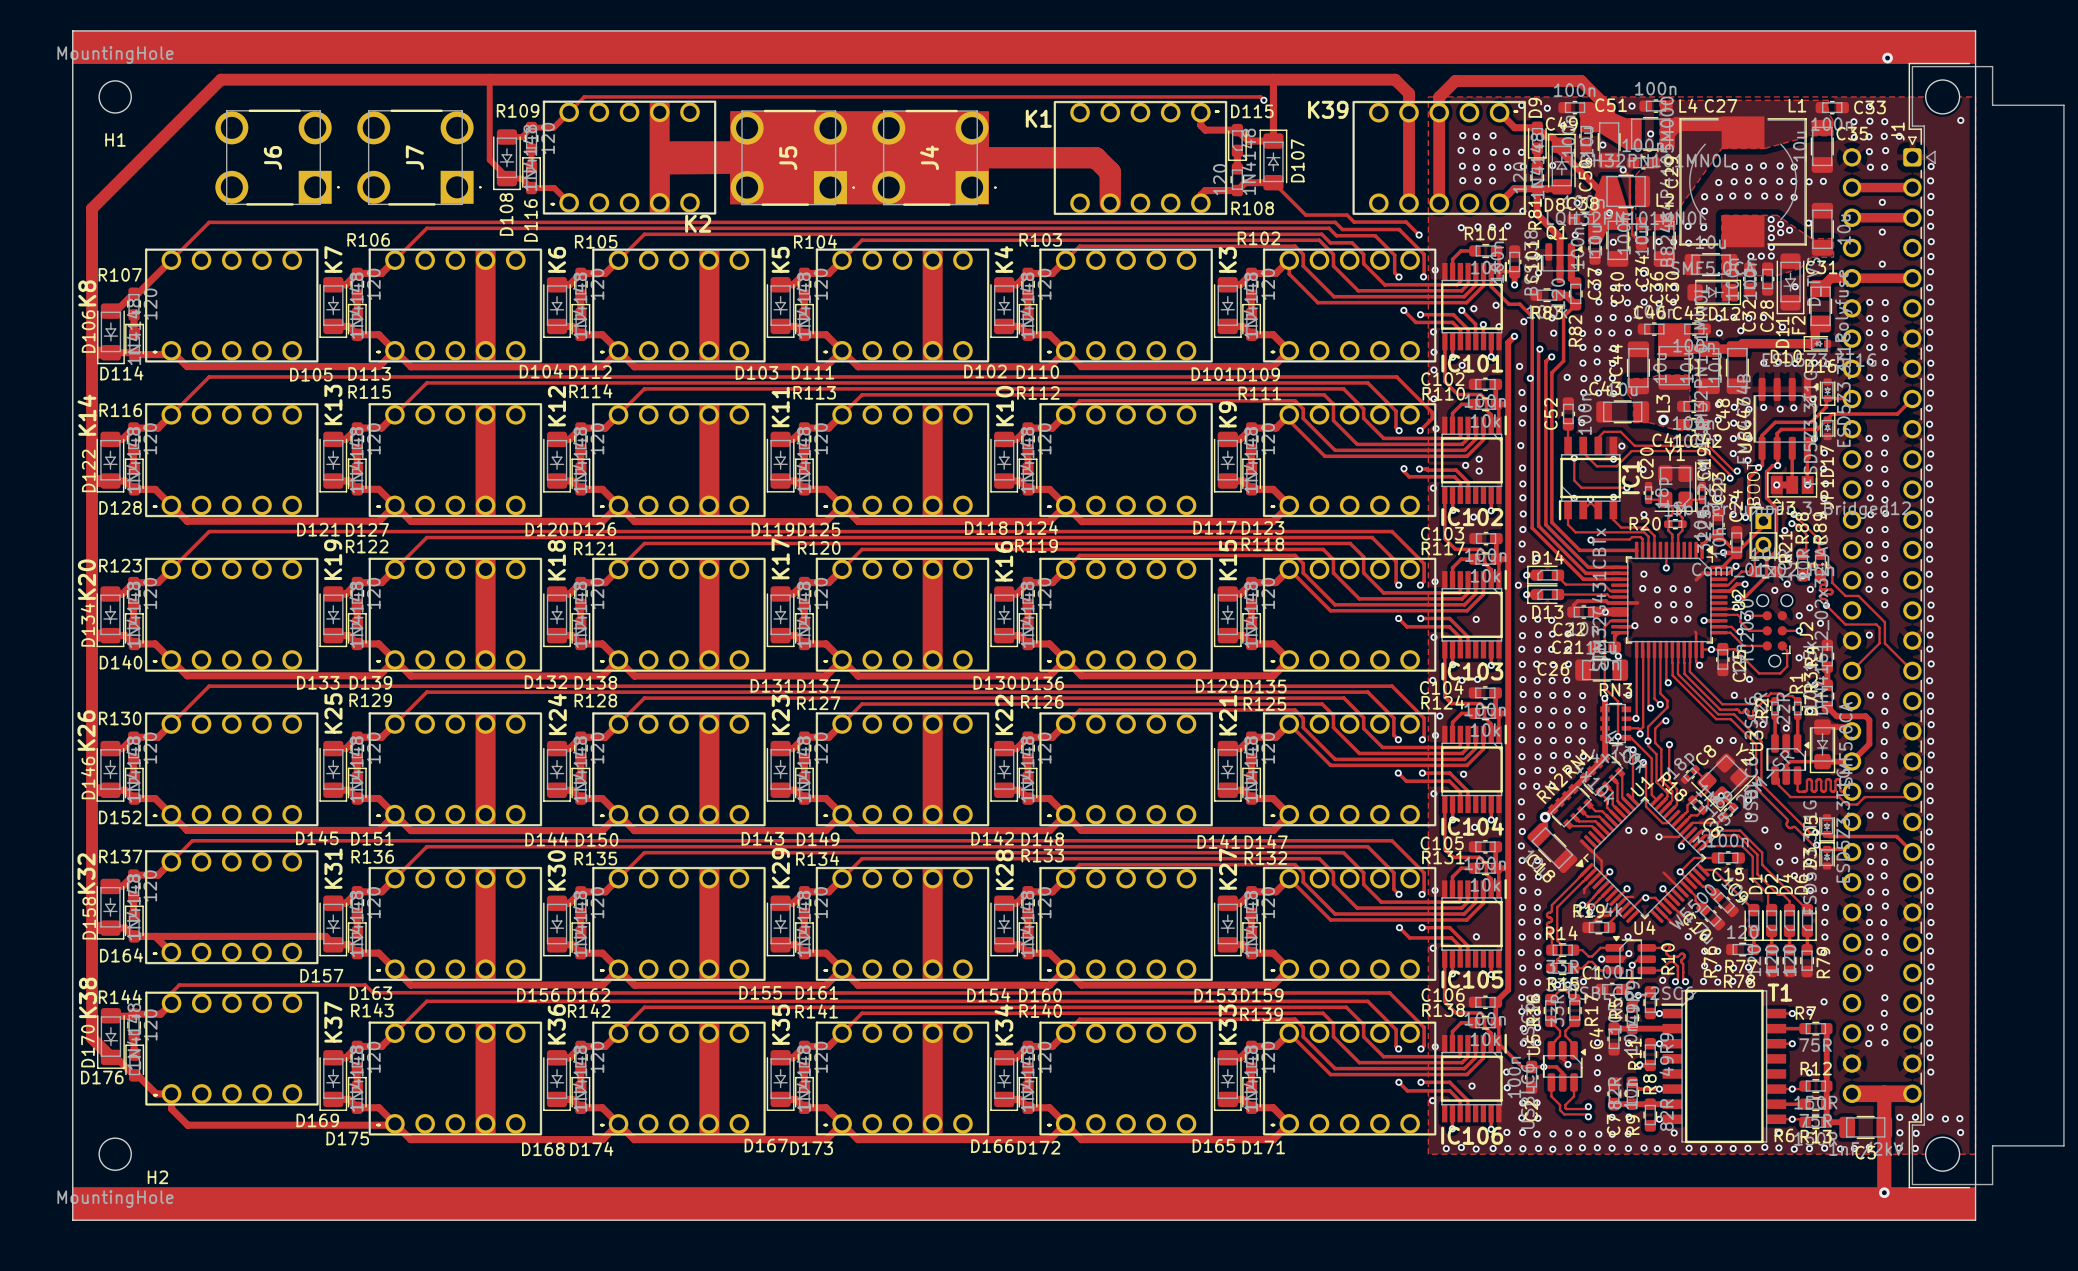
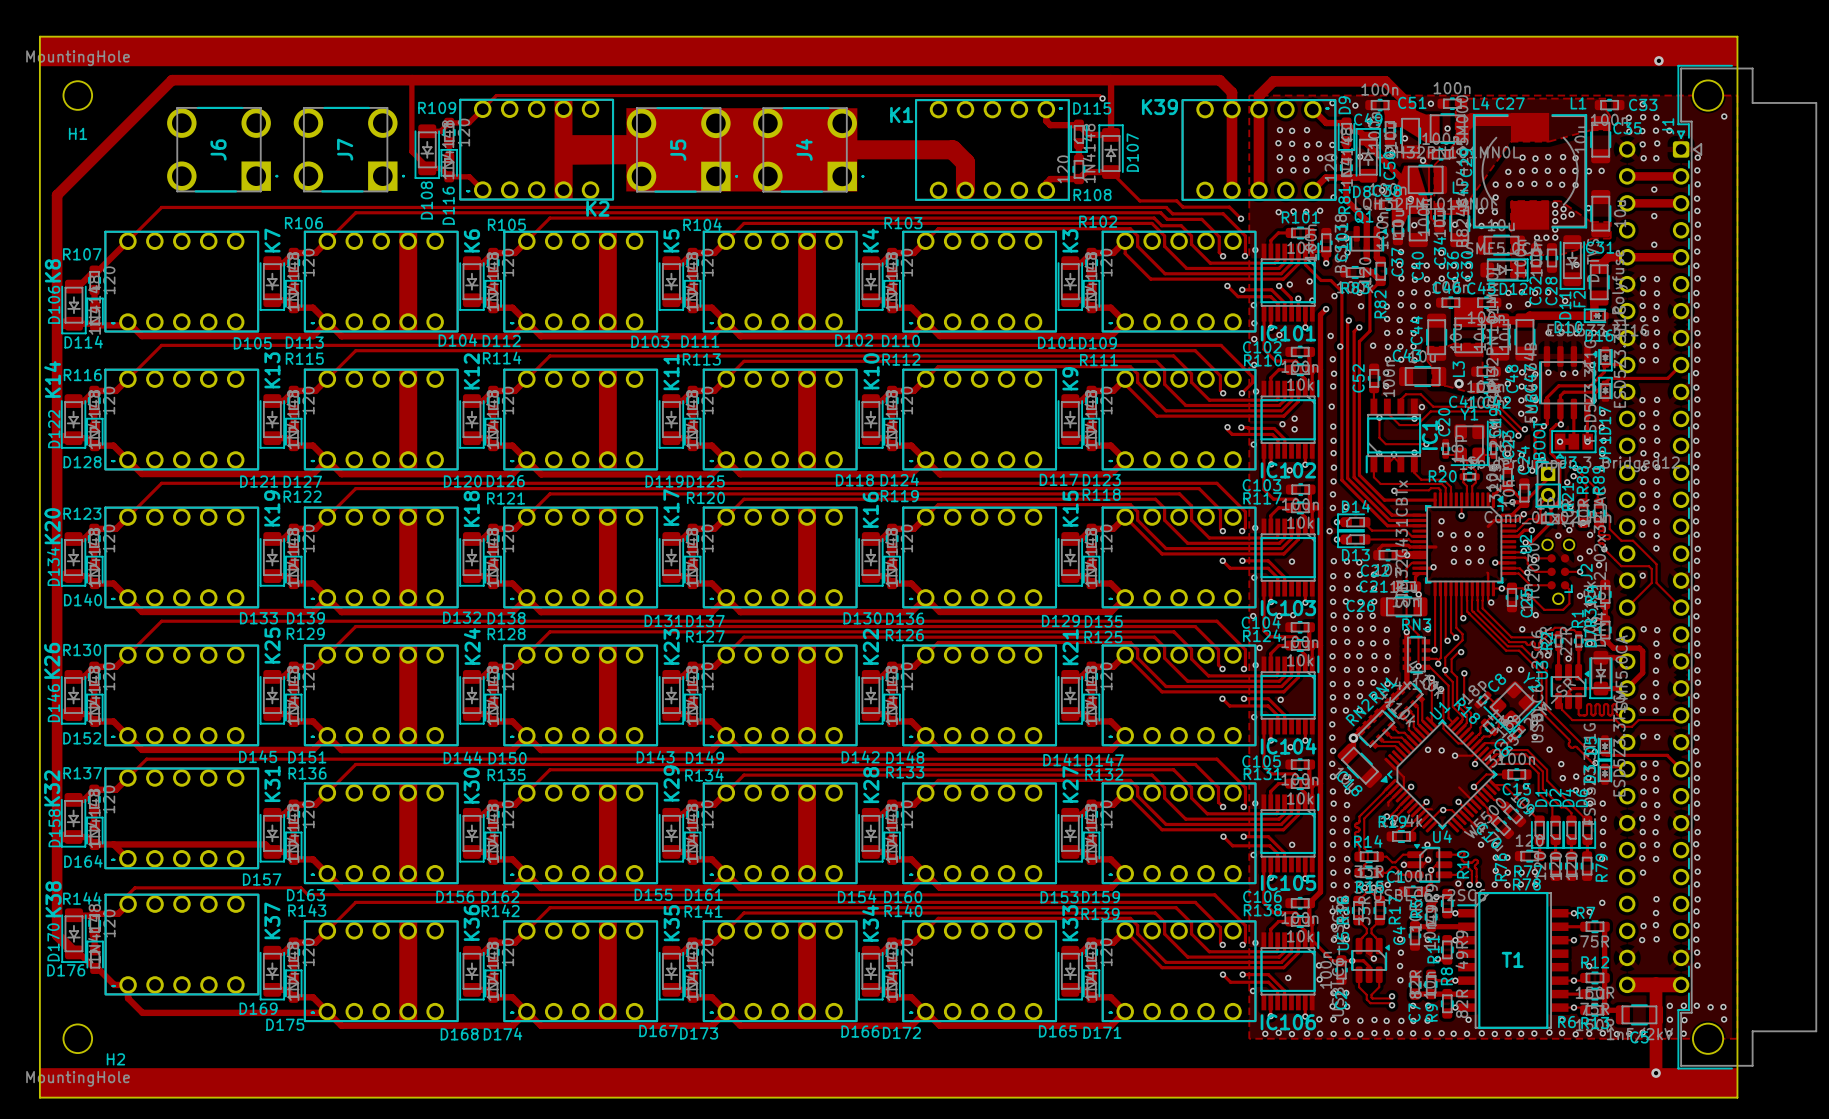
T1 name position: T1 (1779, 992) -> T1 (1512, 959)

